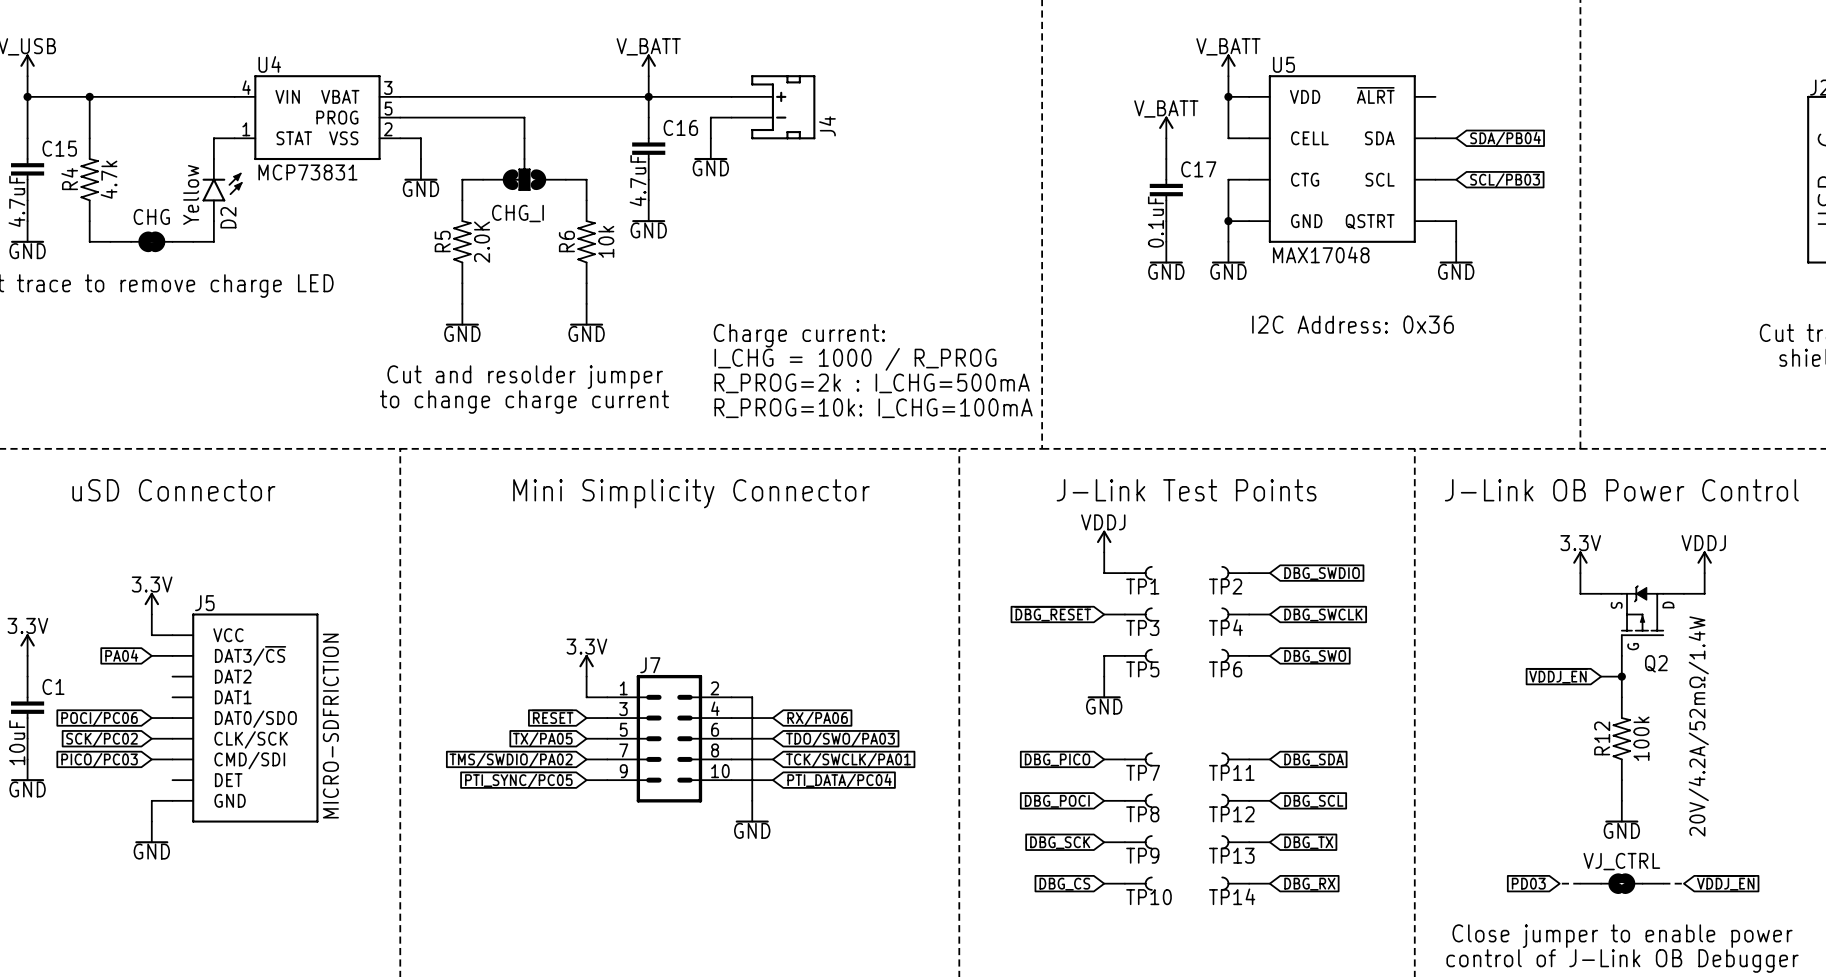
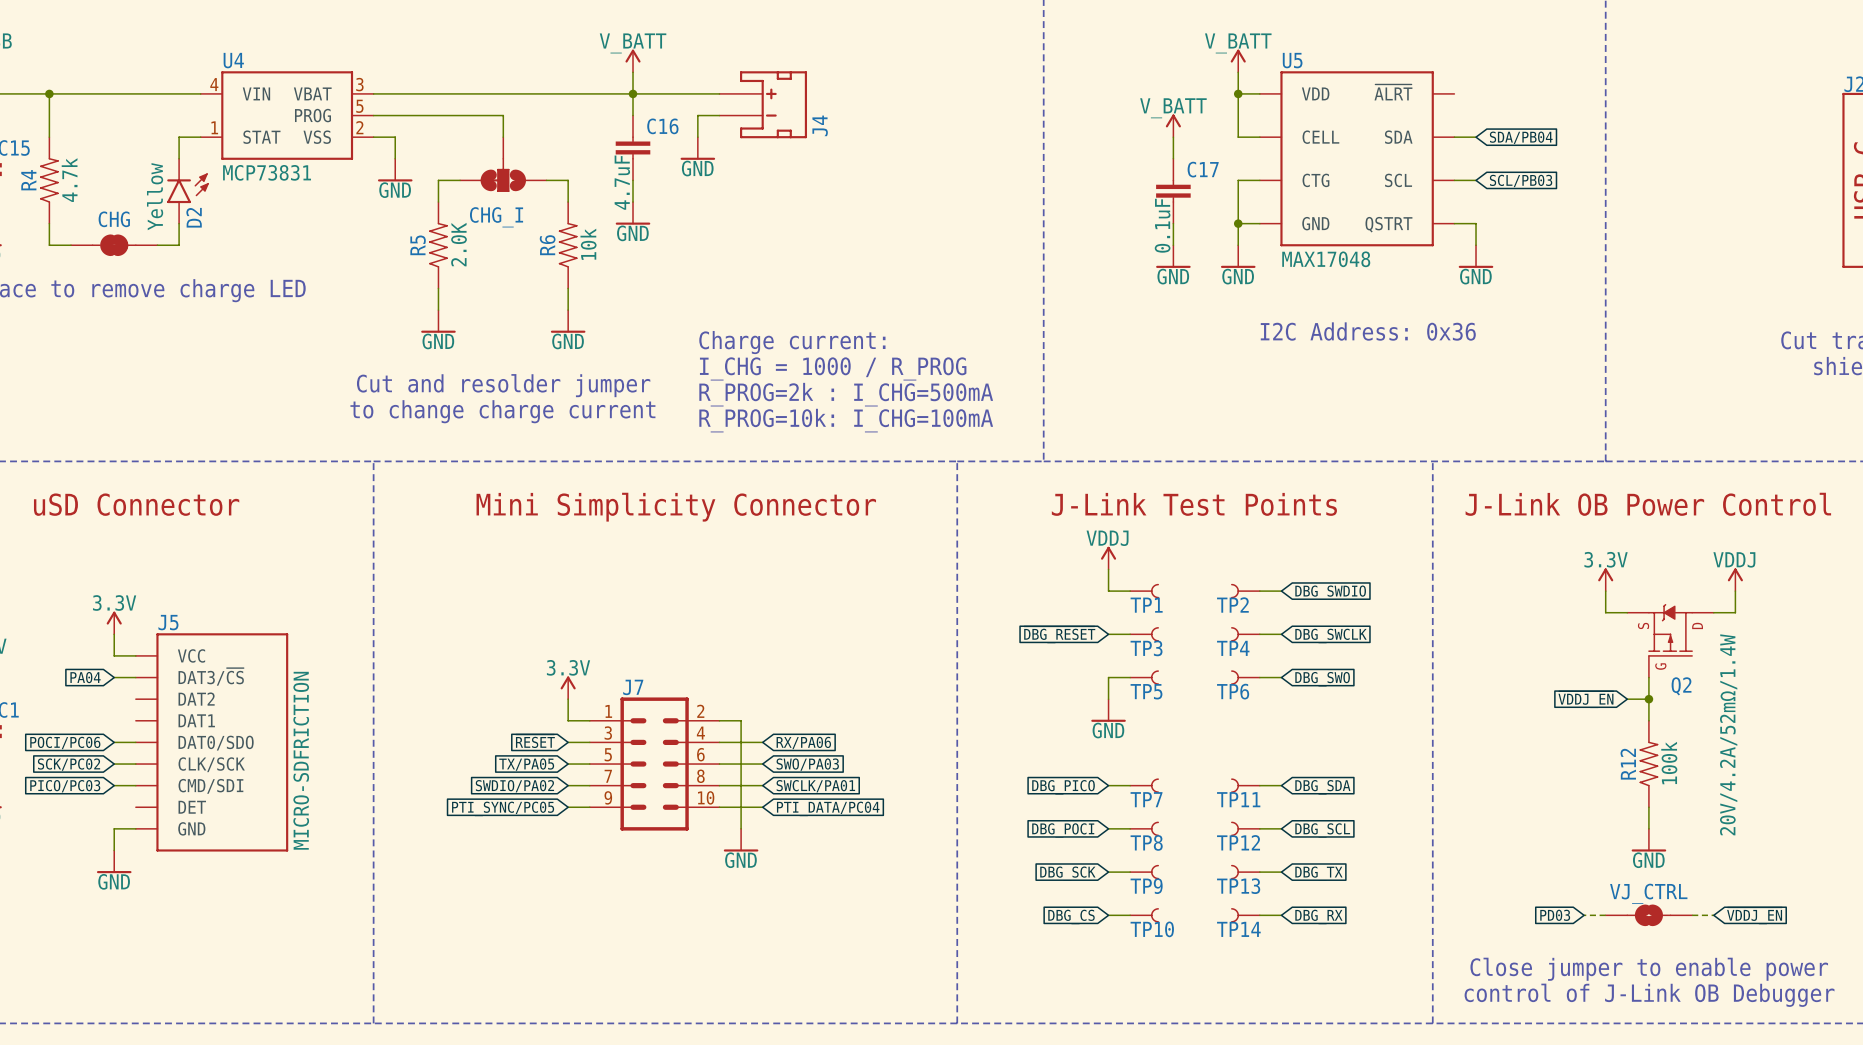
global label: TDO/SWO/PA03 (840, 739) -> SWO/PA03 (807, 764)
global label: TMS/SWDIO/PA02 (511, 760) -> SWDIO/PA02 (514, 786)
global label: TCK/SWCLK/PA01 (848, 760) -> SWCLK/PA01 (815, 786)

